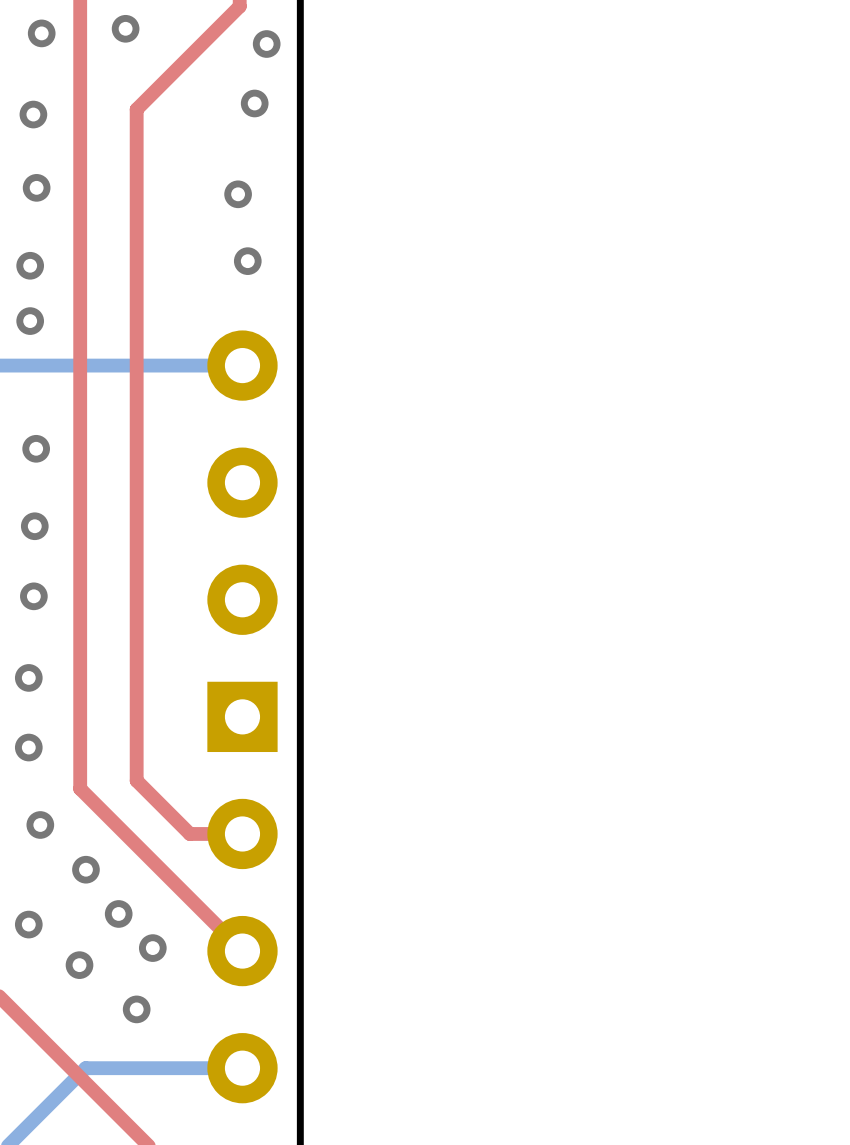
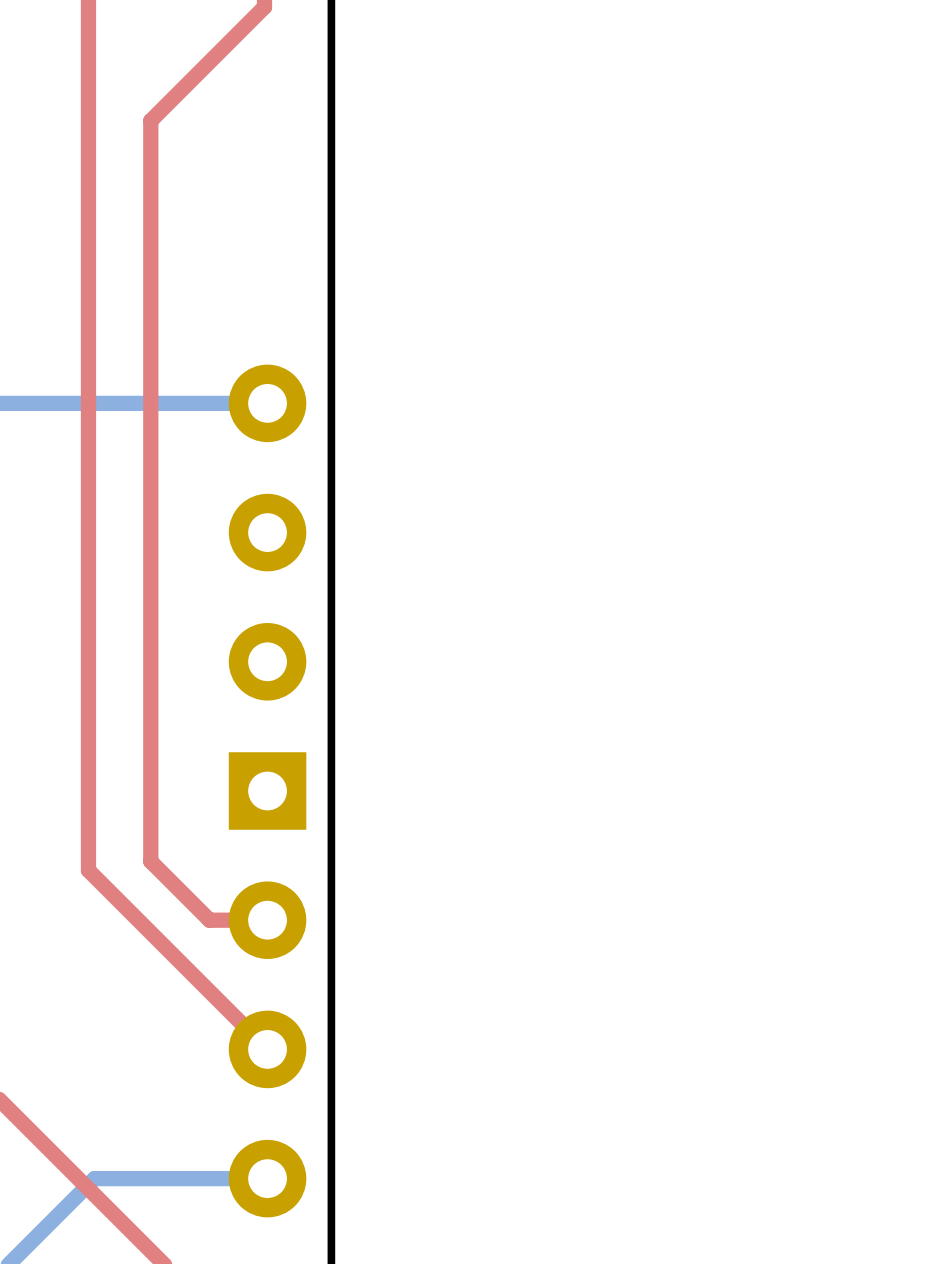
via: (125, 28) -> none
via: (41, 33) -> none
via: (266, 44) -> none
via: (254, 103) -> none
via: (33, 114) -> none
via: (36, 187) -> none
via: (238, 194) -> none
via: (247, 261) -> none
via: (30, 265) -> none
via: (30, 321) -> none
via: (36, 448) -> none
via: (34, 526) -> none
via: (33, 596) -> none
via: (28, 677) -> none
via: (28, 747) -> none
via: (40, 824) -> none
via: (85, 869) -> none
via: (118, 913) -> none
via: (28, 924) -> none
via: (152, 948) -> none
via: (79, 965) -> none
via: (136, 1009) -> none

